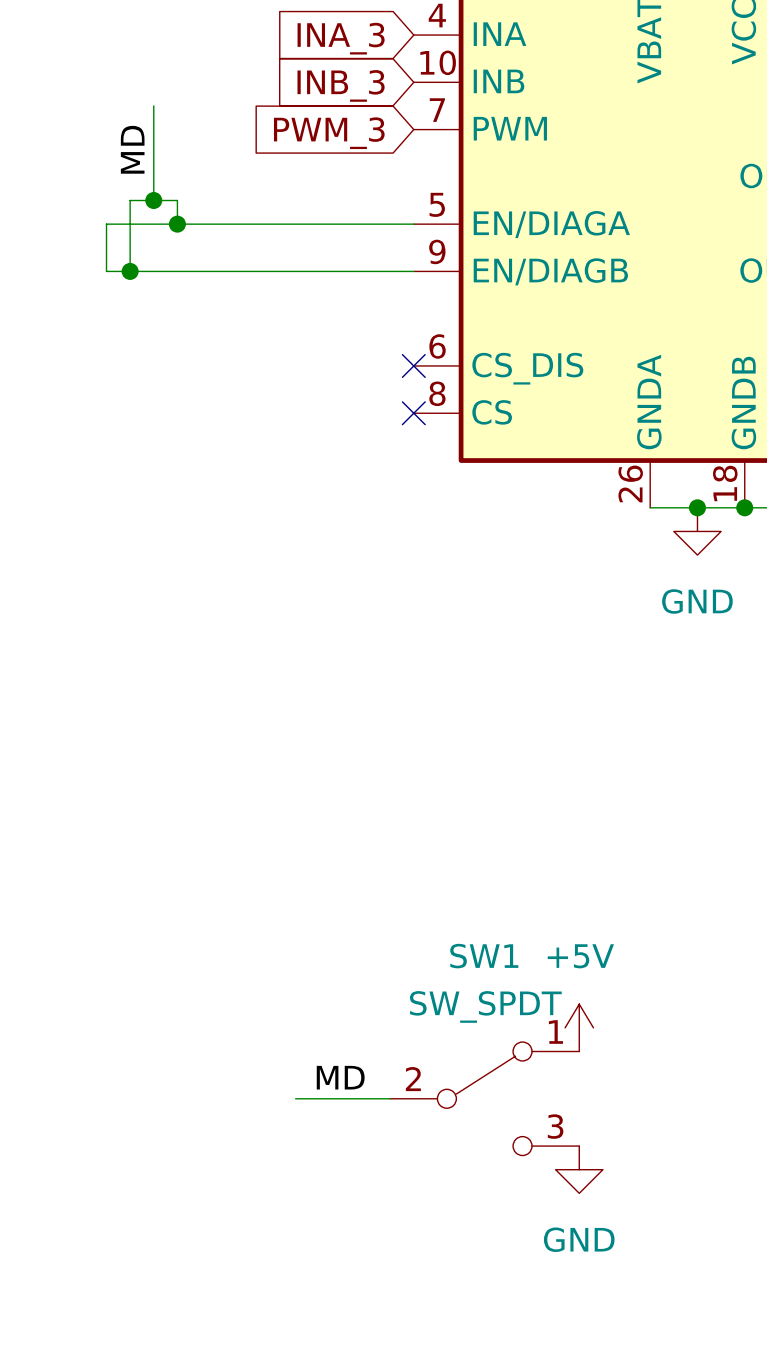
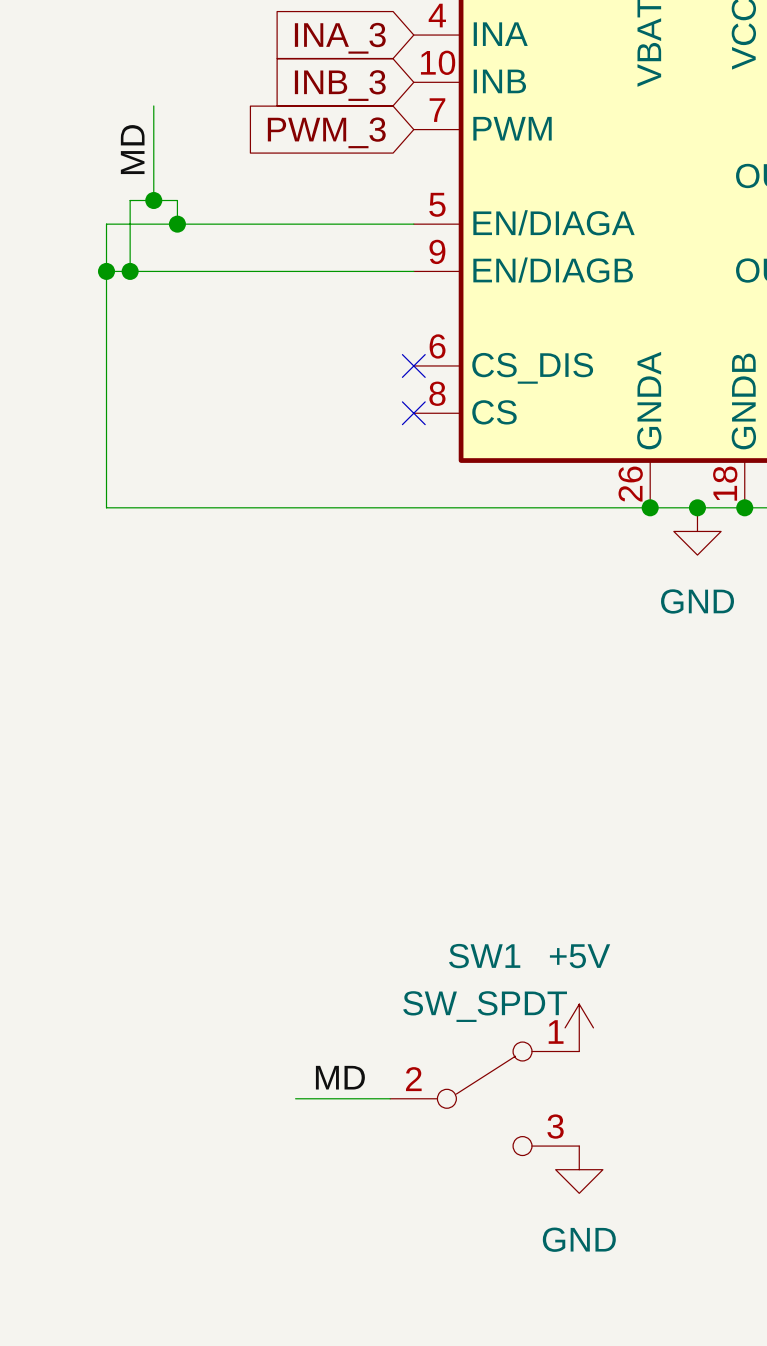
wire: none -> (106, 271) (106, 507) (650, 507)
junction: none -> (106, 271)
junction: none -> (650, 507)

